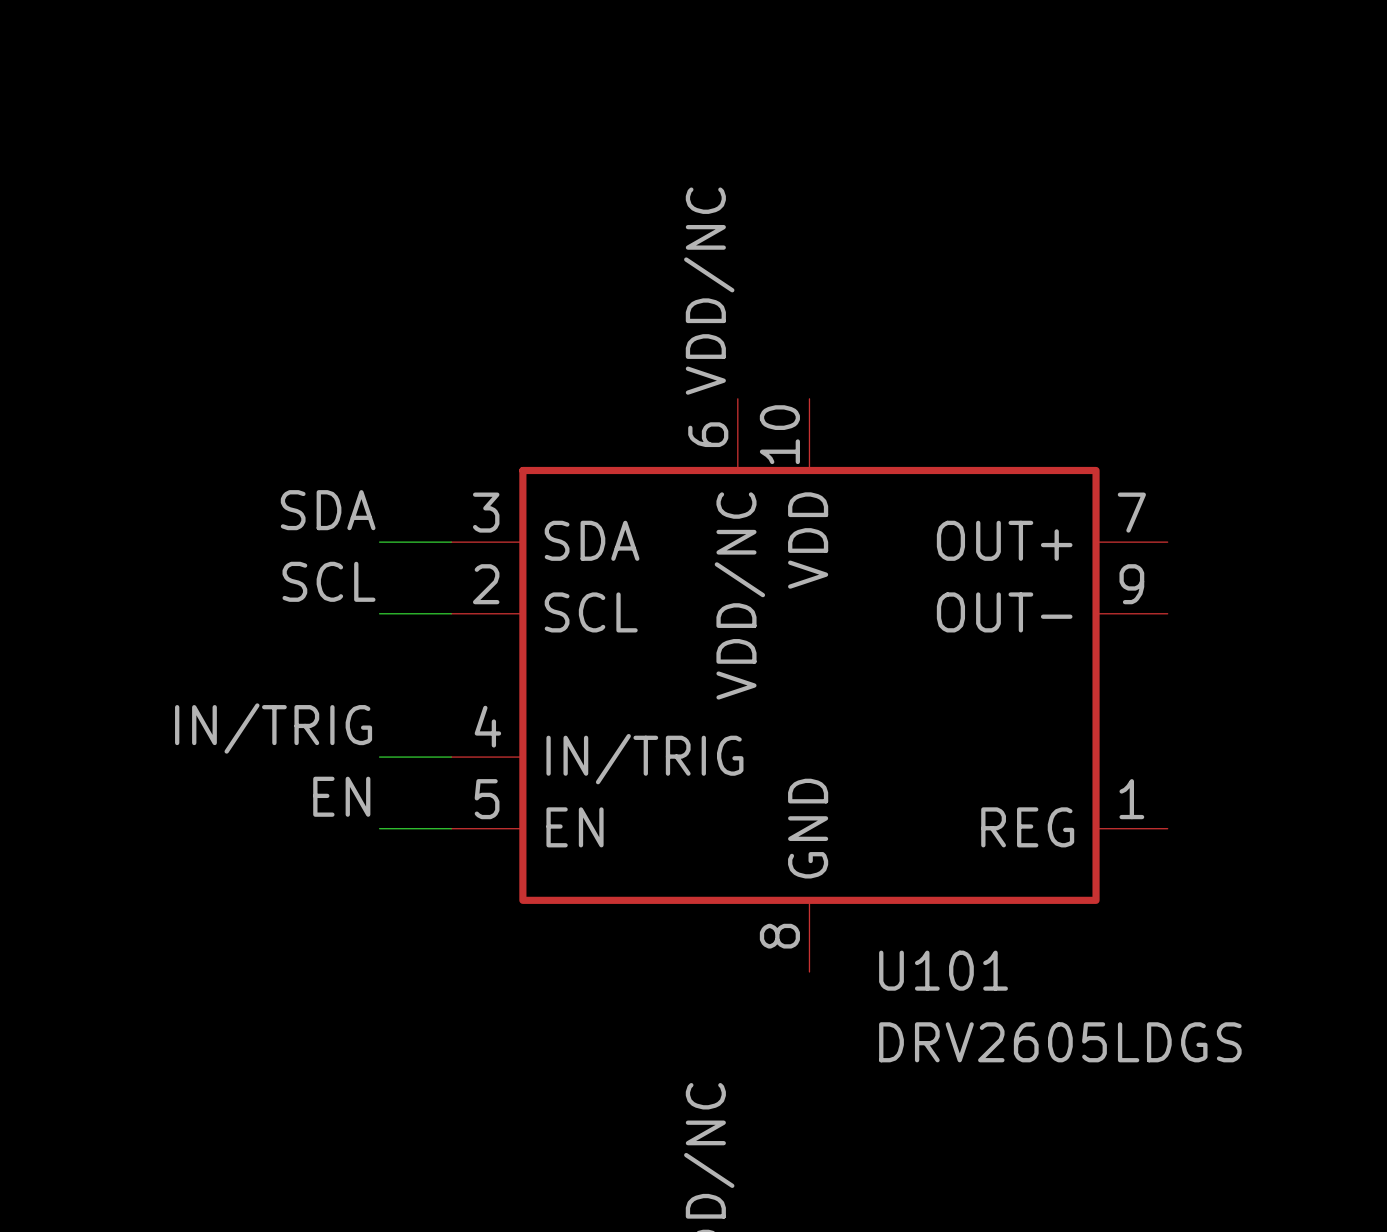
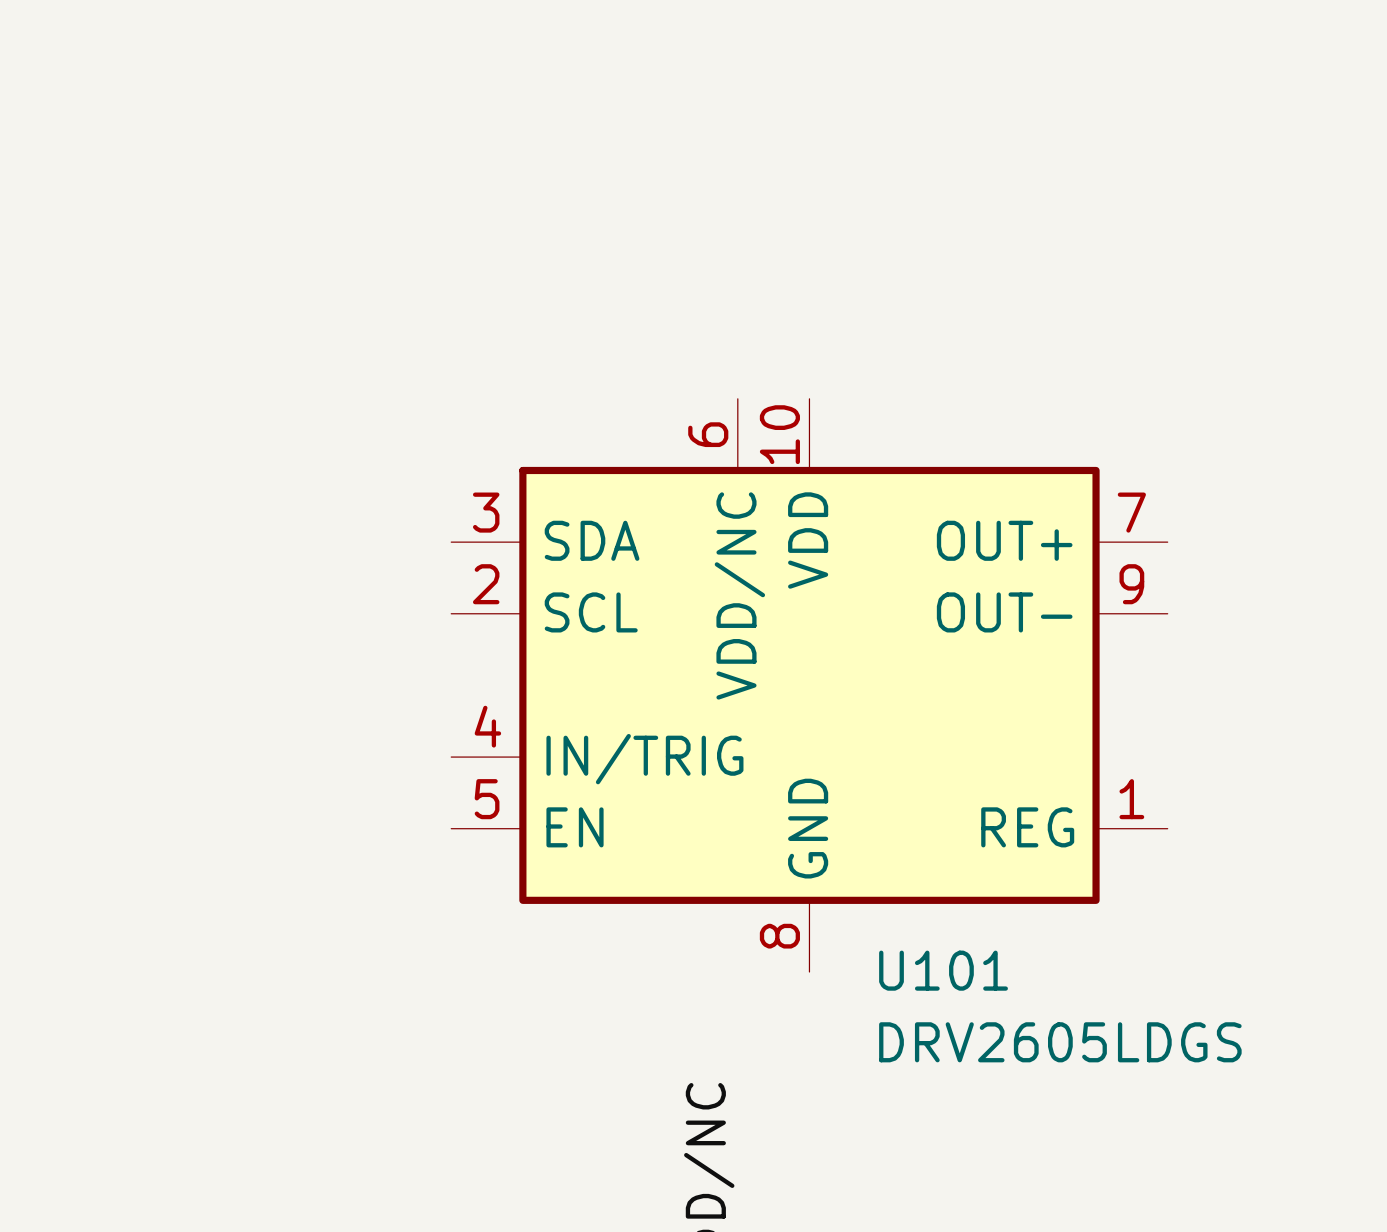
label: VDD/NC (709, 291) -> none
label: SDA (328, 510) -> none
wire: (379, 542) (451, 542) -> none
label: SCL (329, 581) -> none
wire: (379, 613) (451, 613) -> none
label: IN/TRIG (273, 728) -> none
wire: (379, 757) (451, 757) -> none
label: EN (341, 796) -> none
wire: (379, 828) (451, 828) -> none

